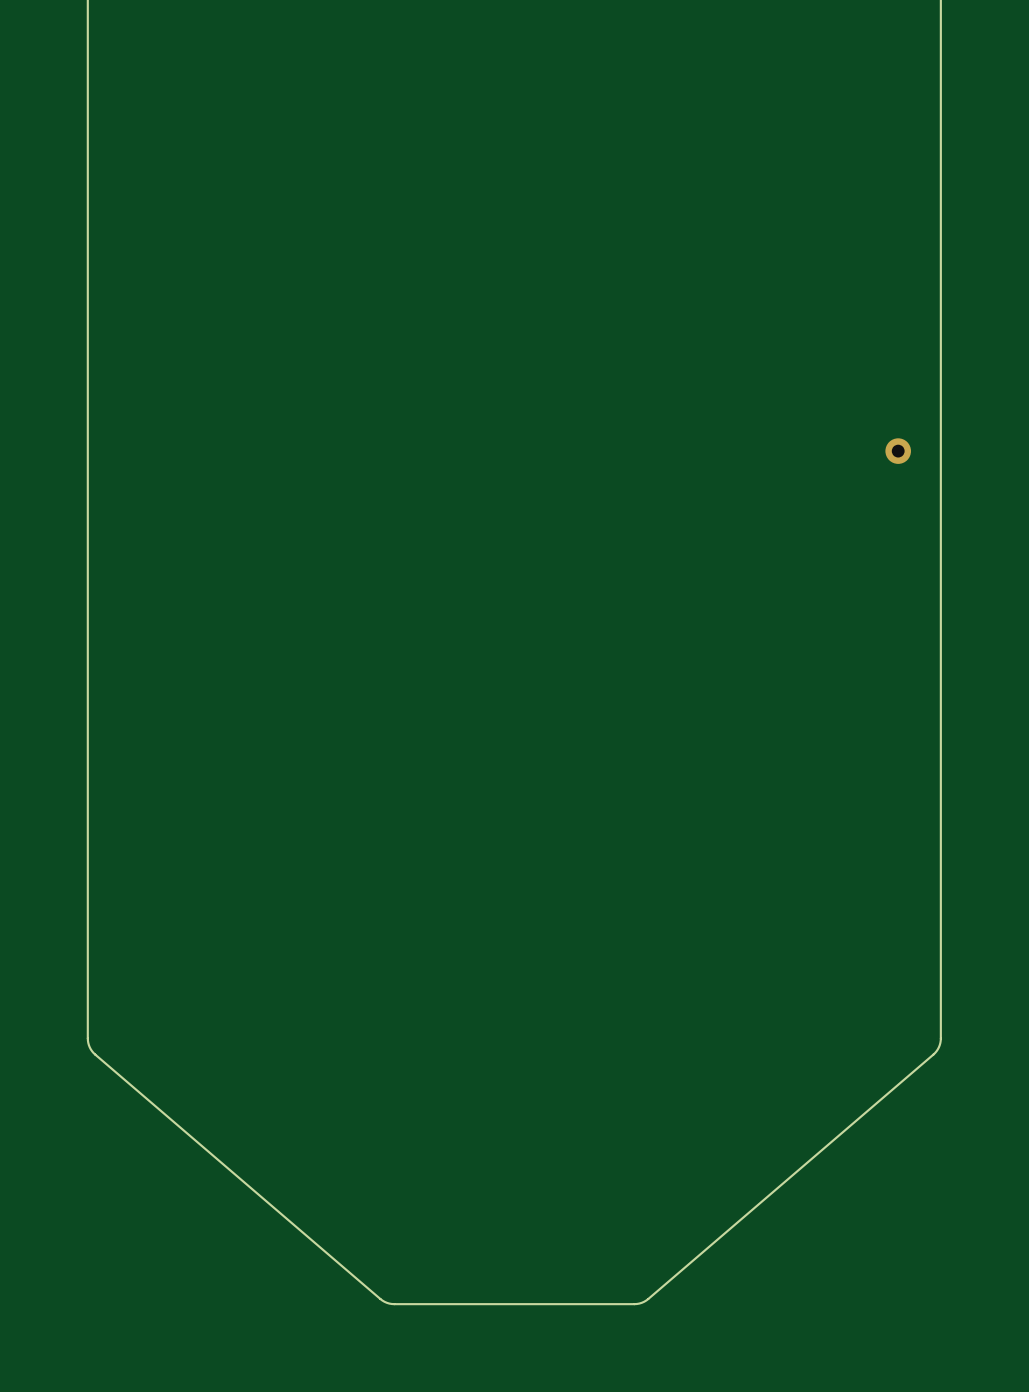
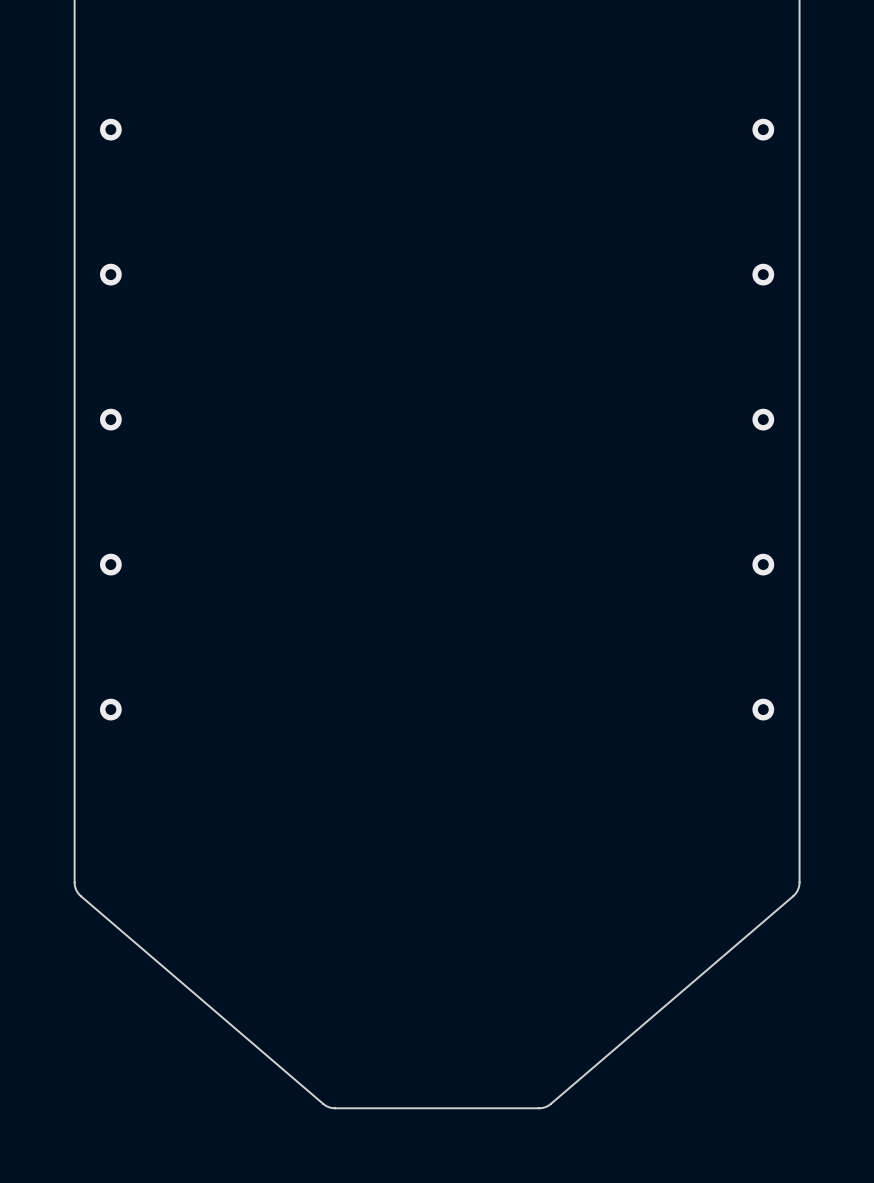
via: none -> (110, 129)
via: none -> (763, 129)
via: none -> (110, 274)
via: none -> (763, 274)
via position: (898, 451) -> (763, 419)
via: none -> (110, 419)
via: none -> (110, 564)
via: none -> (763, 564)
via: none -> (110, 709)
via: none -> (763, 709)

